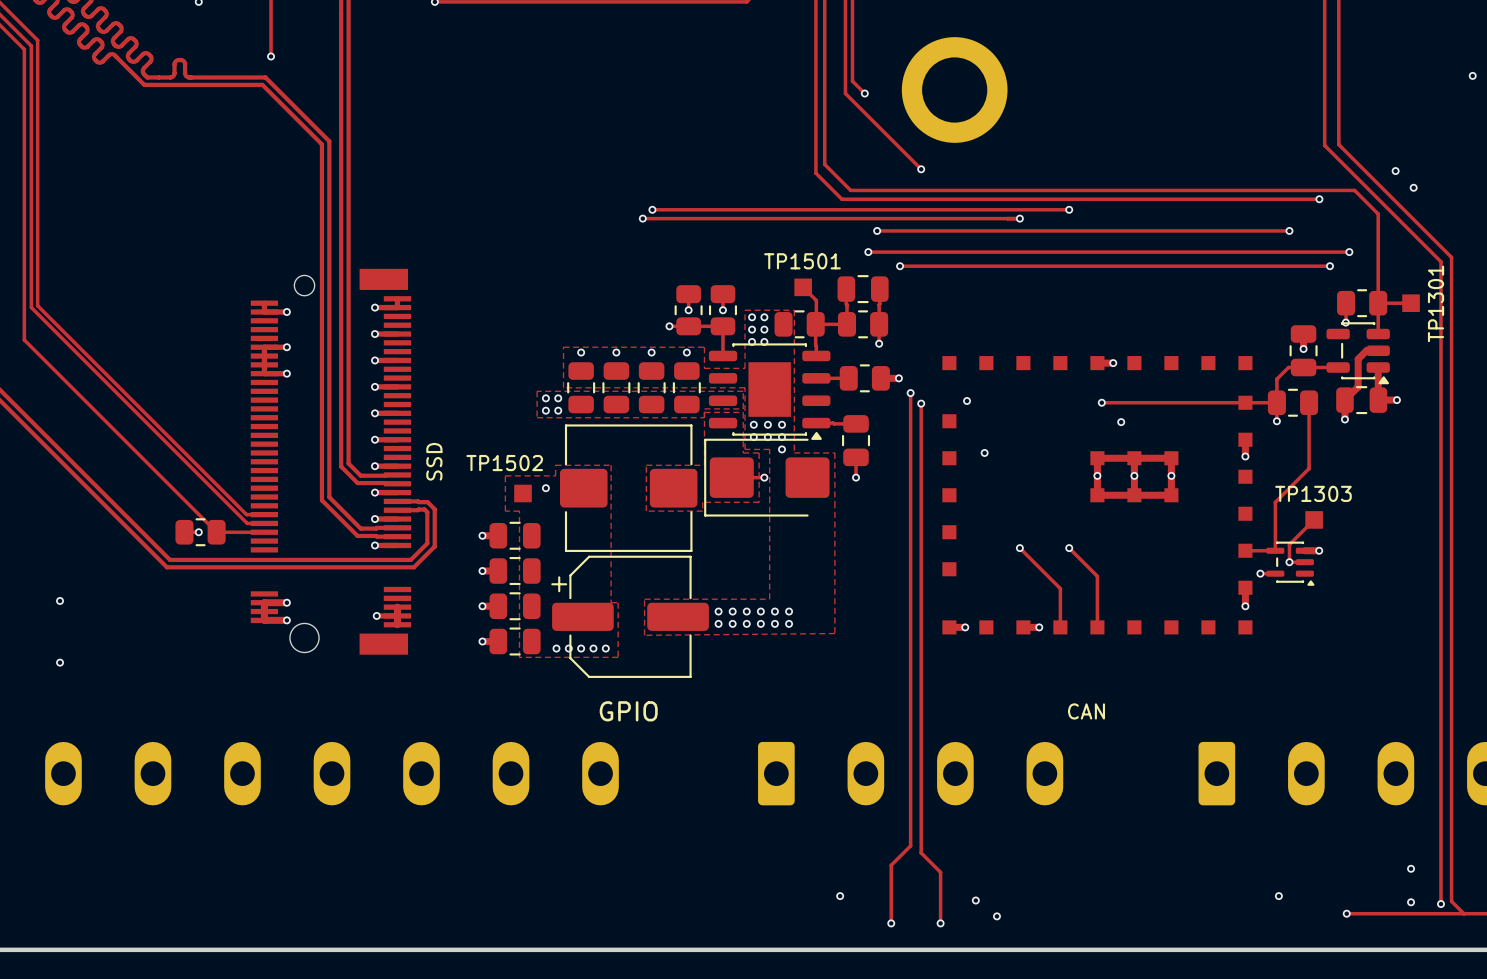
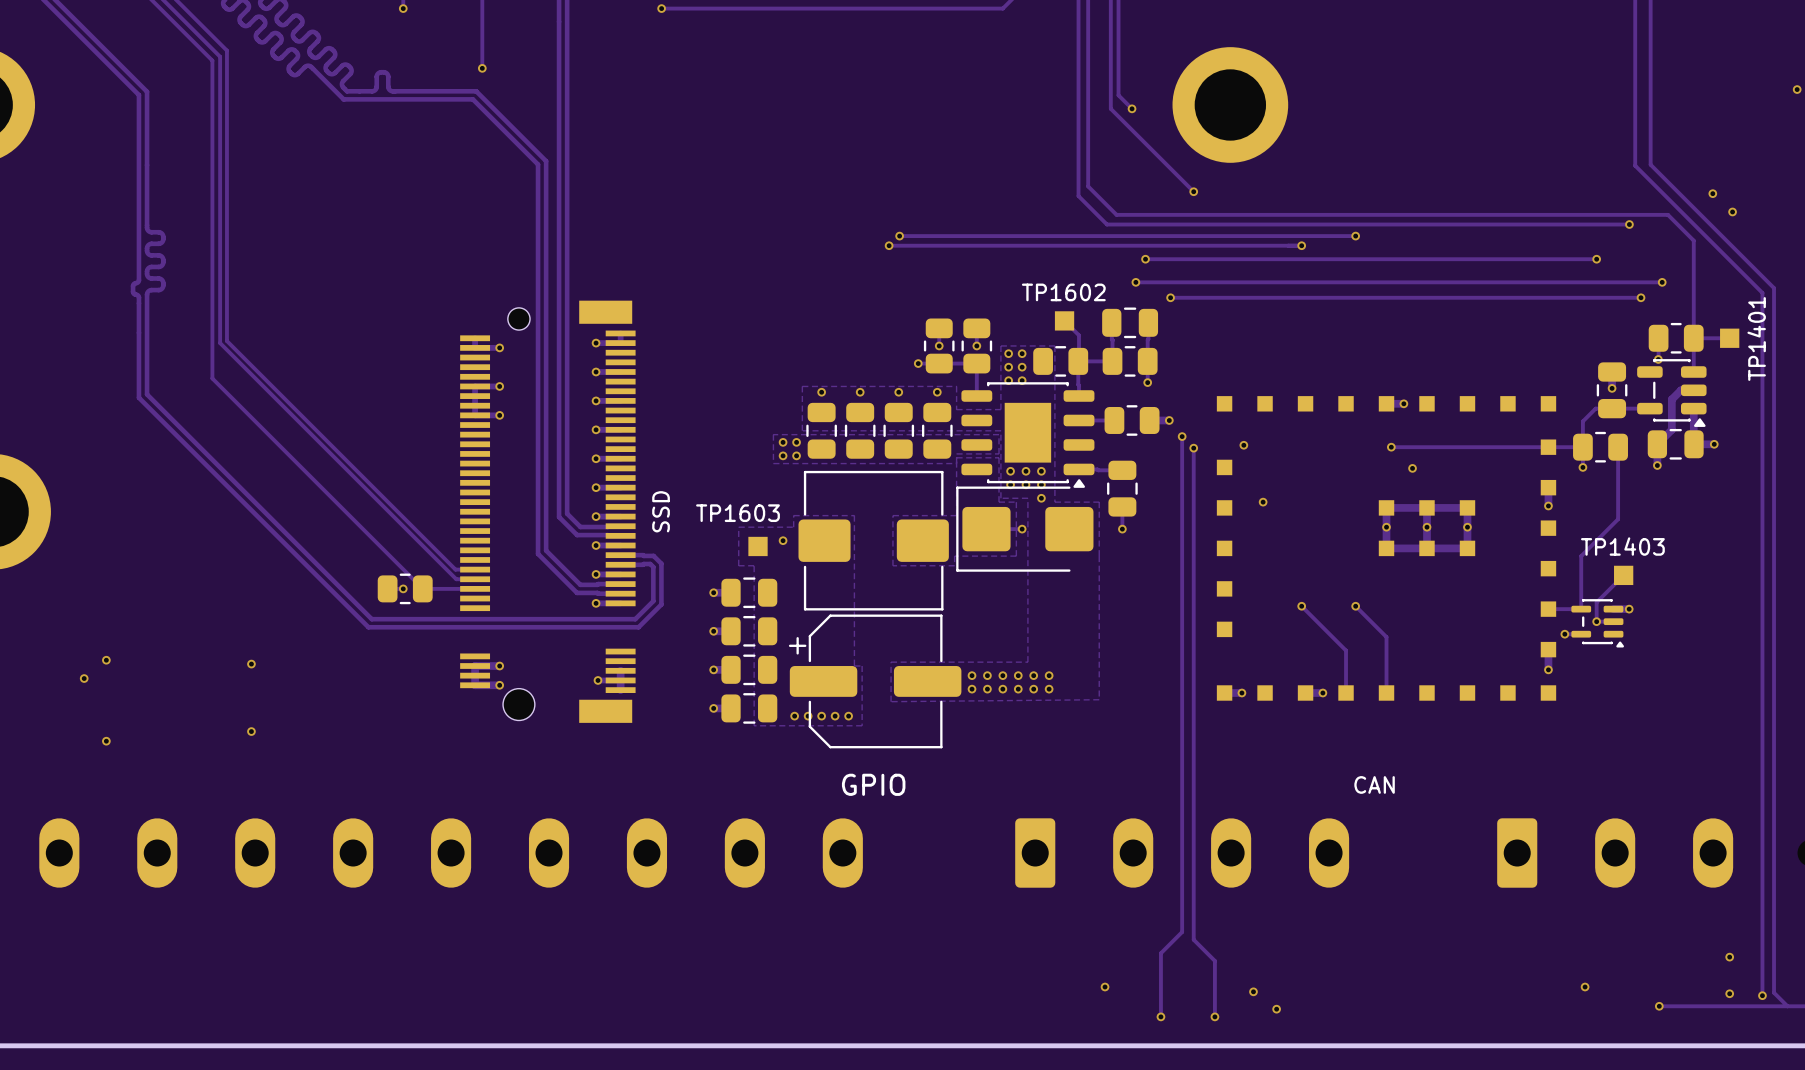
TP1501 name: TP1501 (802, 261) -> TP1602 (1063, 292)
TP1301 name: TP1301 (1436, 303) -> TP1401 (1756, 338)
TP1502 name: TP1502 (504, 463) -> TP1603 (737, 513)
TP1303 name: TP1303 (1313, 493) -> TP1403 (1622, 546)

